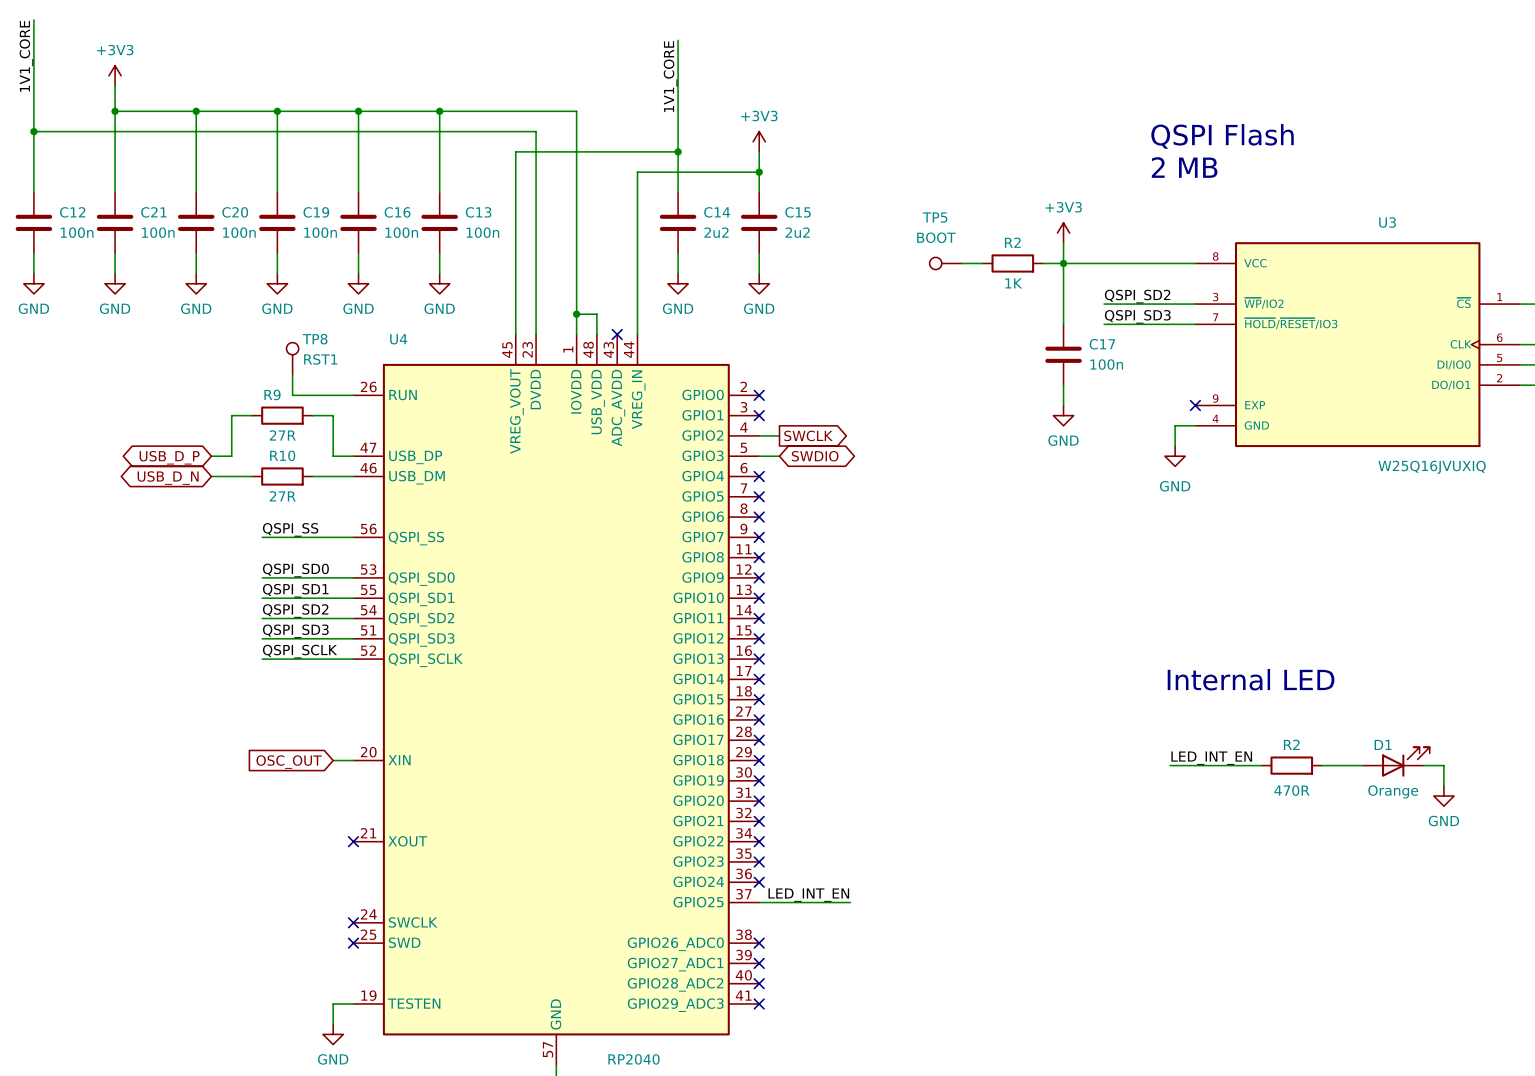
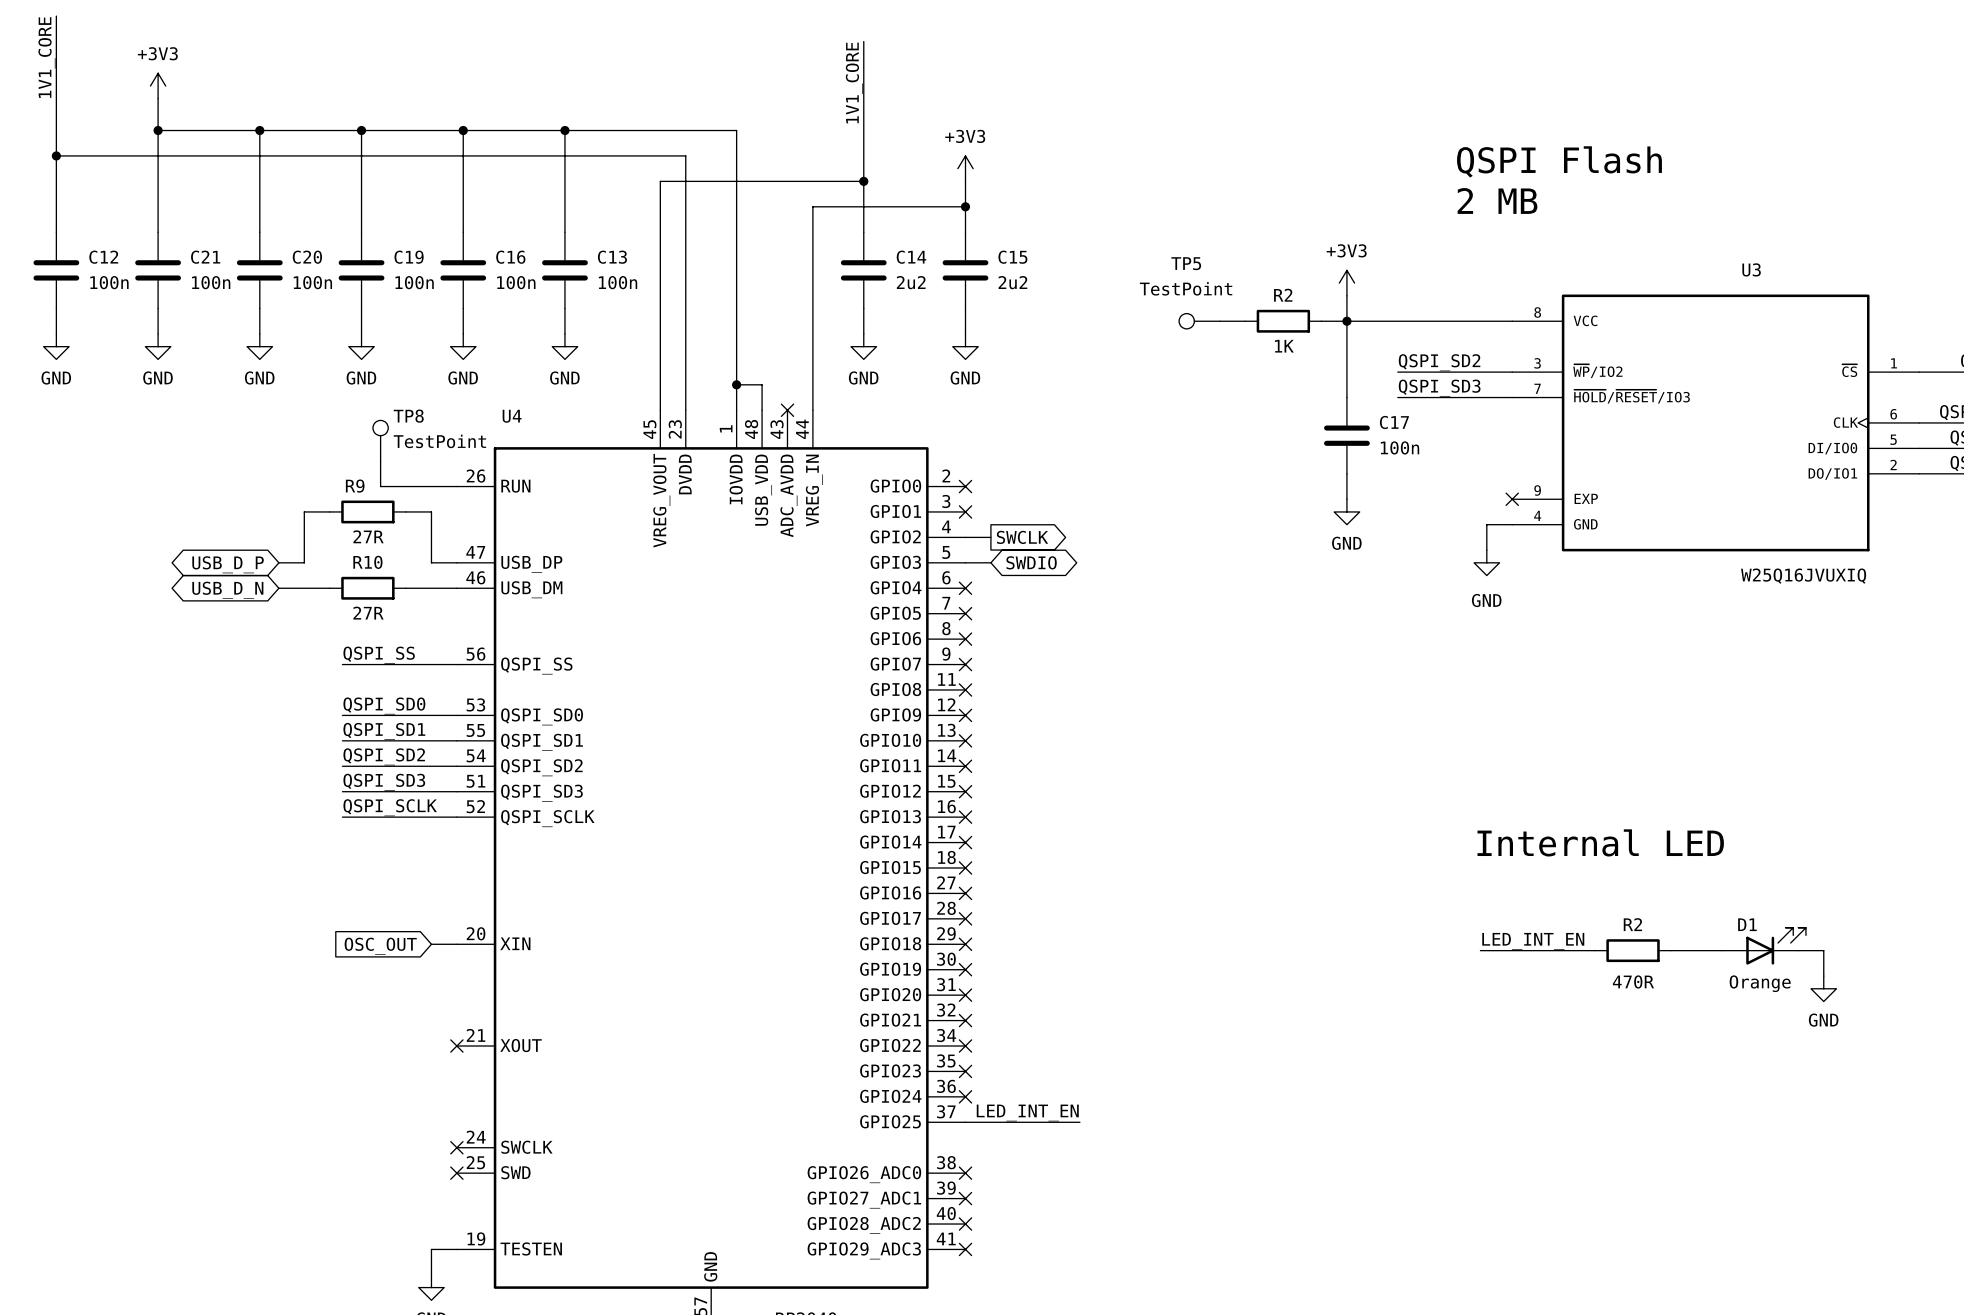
TP5 value: BOOT (936, 237) -> TestPoint (1186, 288)
TP8 value: RST1 (320, 359) -> TestPoint (439, 441)

